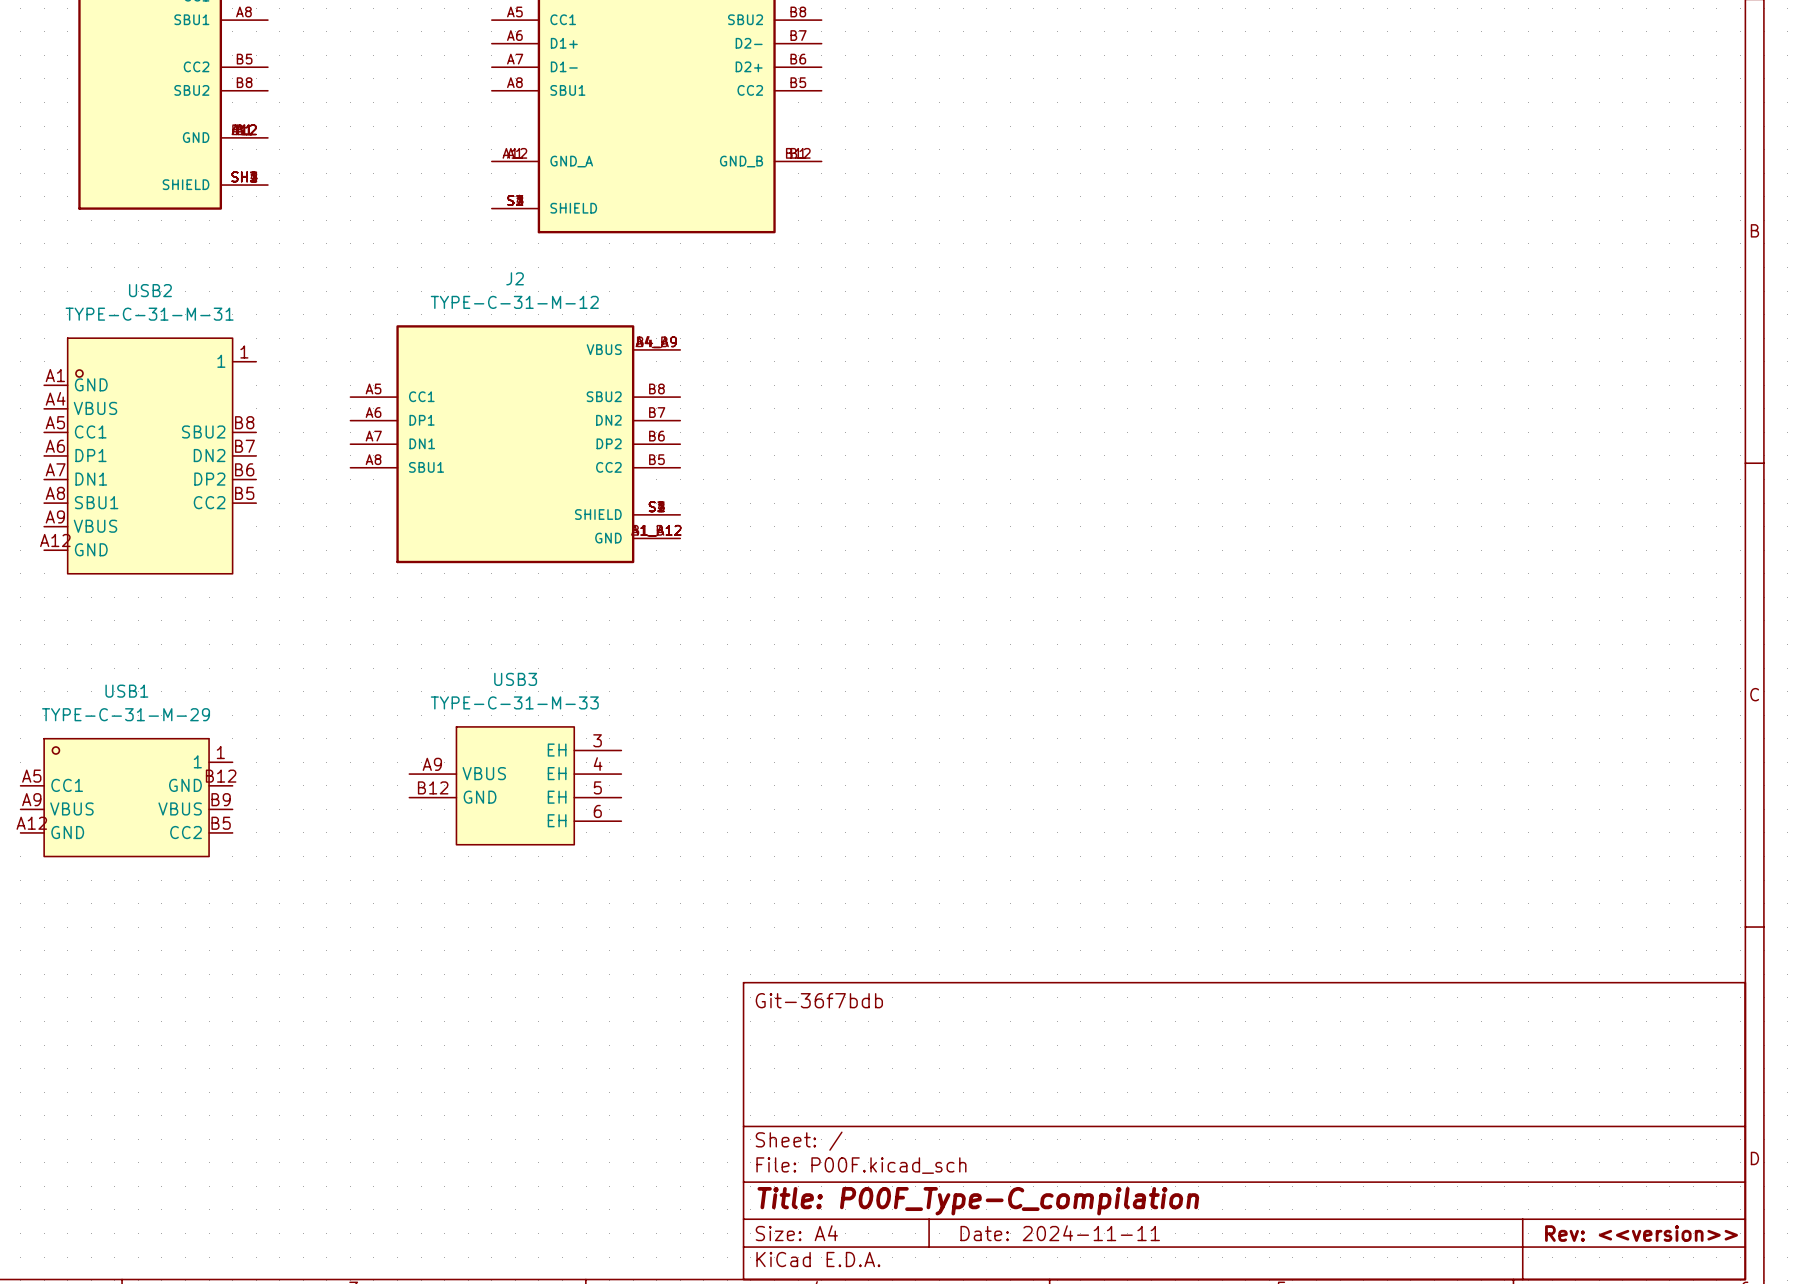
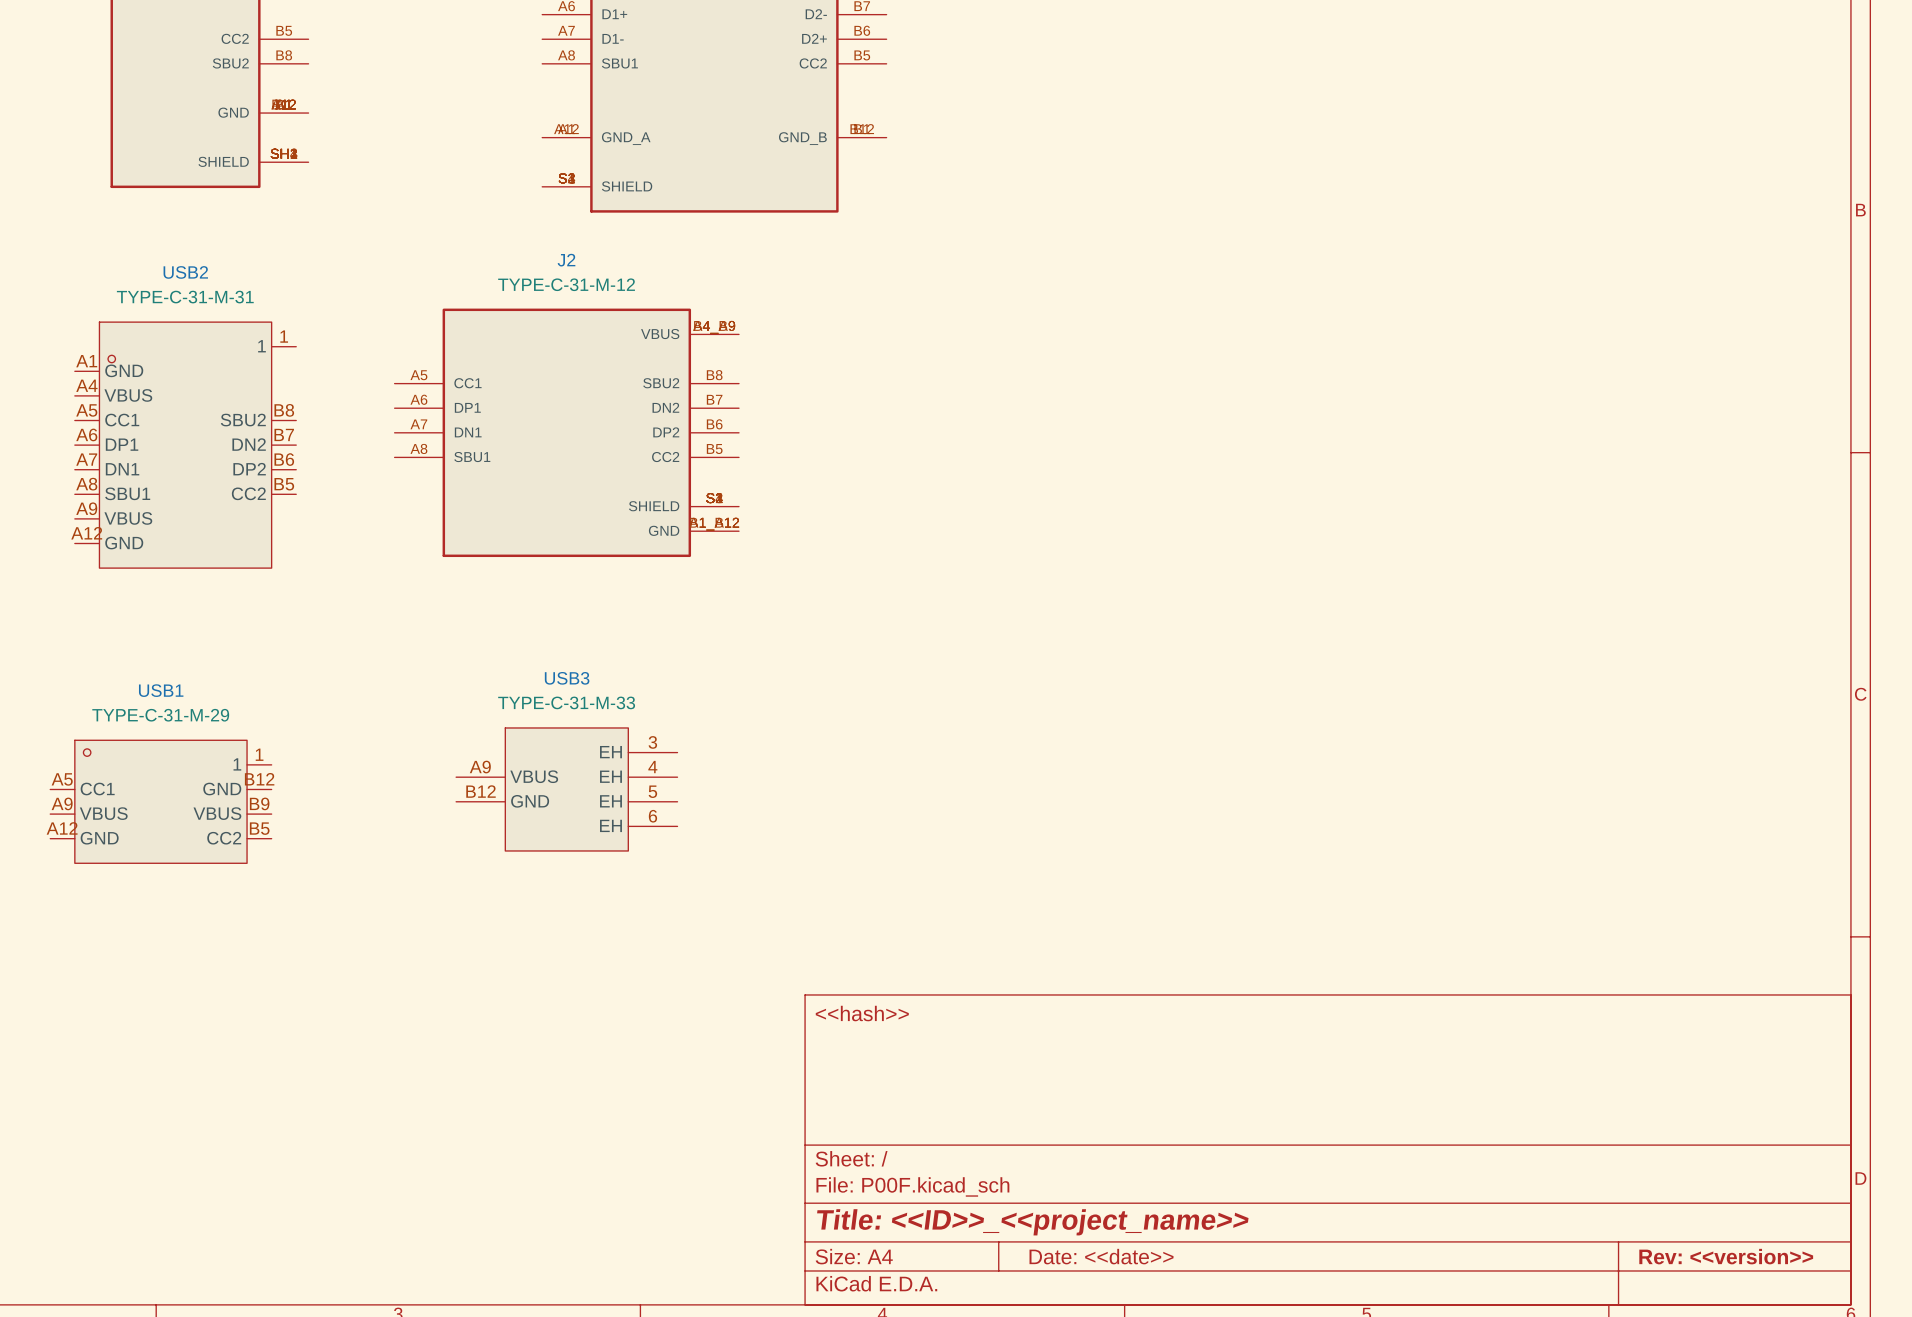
title block: Git-36f7bdb (819, 1000) -> <<hash>> (862, 1013)
title block: Title: P00F_Type-C_compilation (978, 1201) -> Title: <<ID>>_<<project_name>> (1032, 1222)
title block: Date: 2024-11-11 (1060, 1233) -> Date: <<date>> (1101, 1256)

